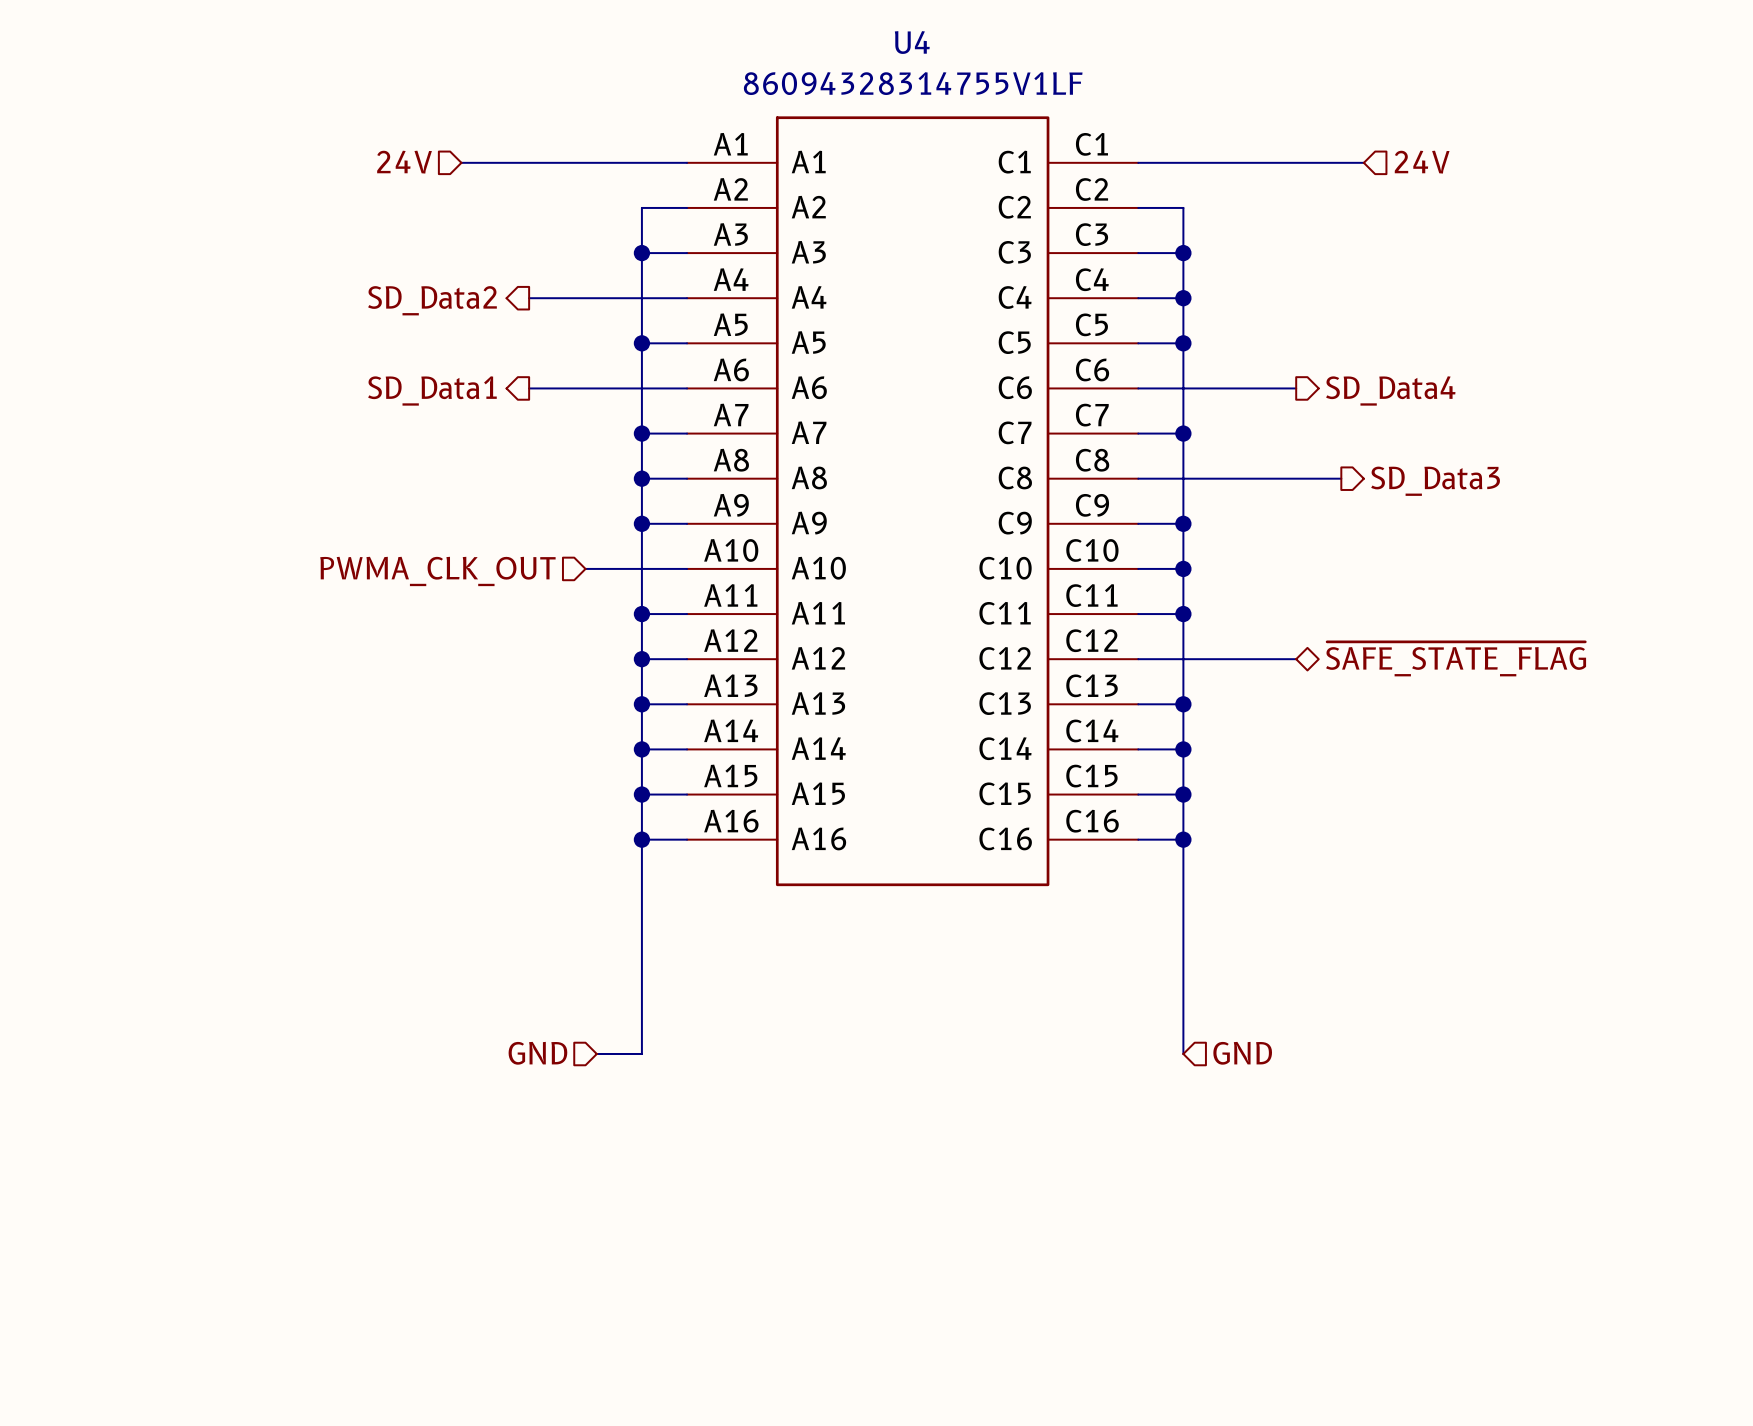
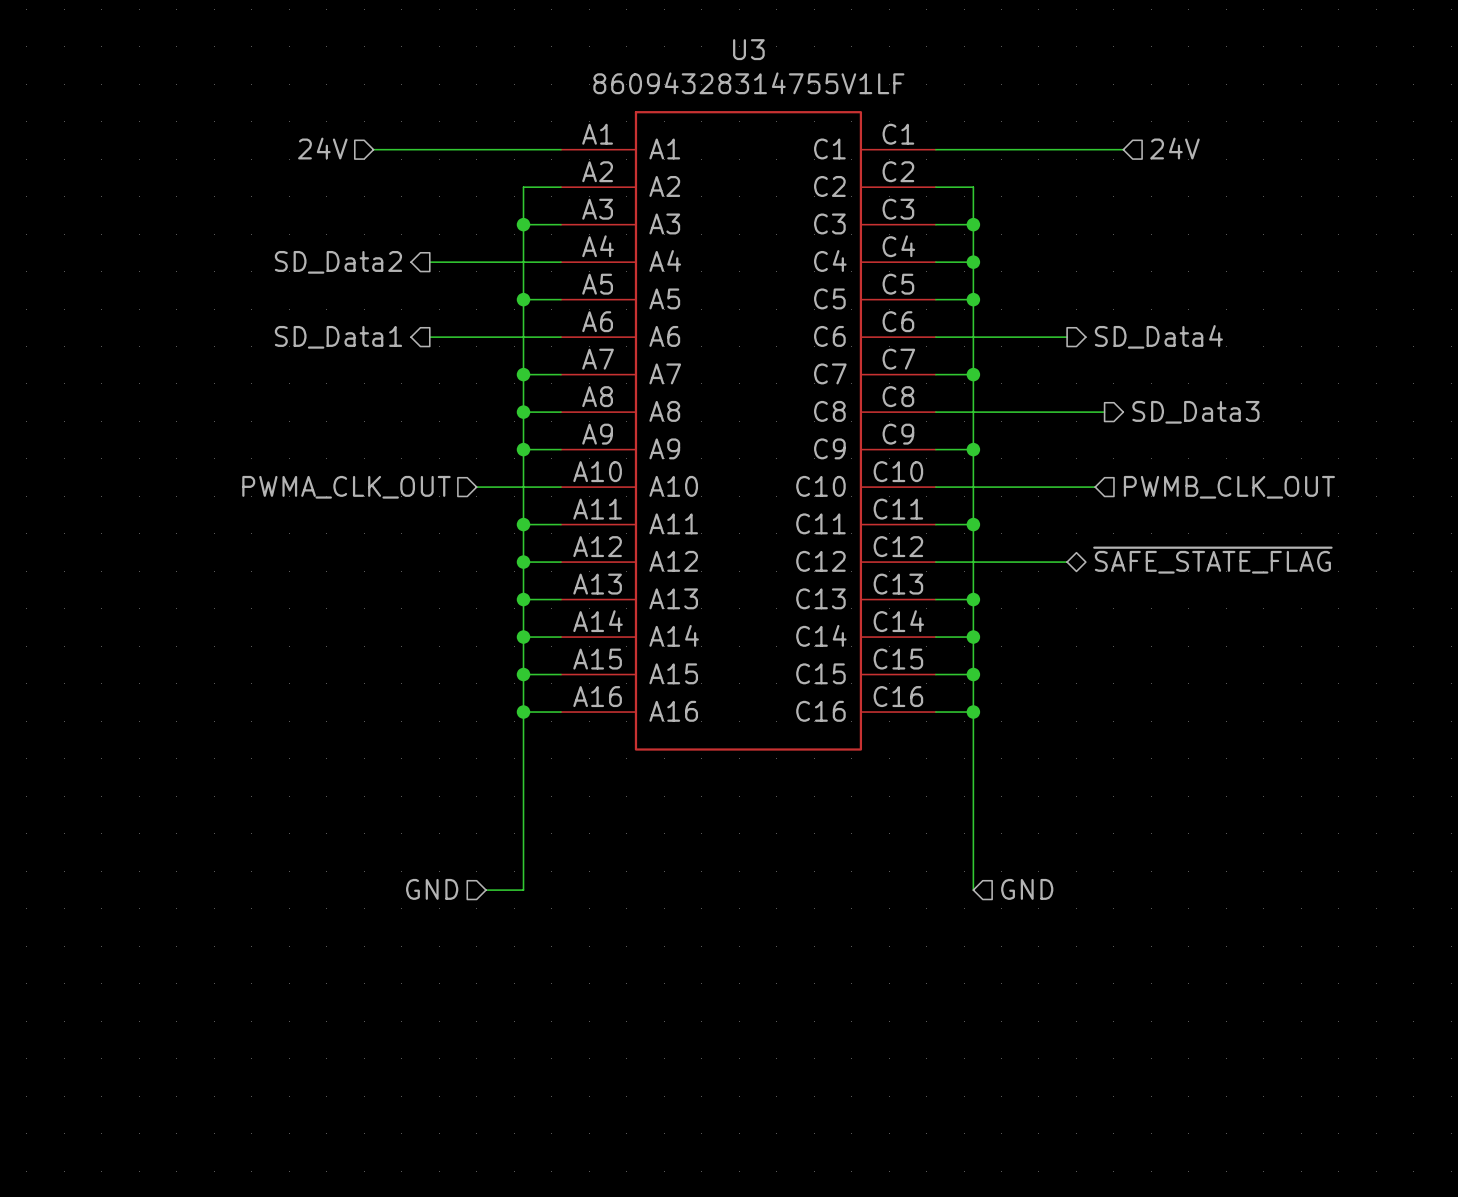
U4 name: U4 (912, 42) -> U3 (748, 49)
wire: none -> (973, 487) (1095, 487)
junction: (1183, 568) -> none
hierarchical label: none -> PWMB_CLK_OUT (1229, 487)

